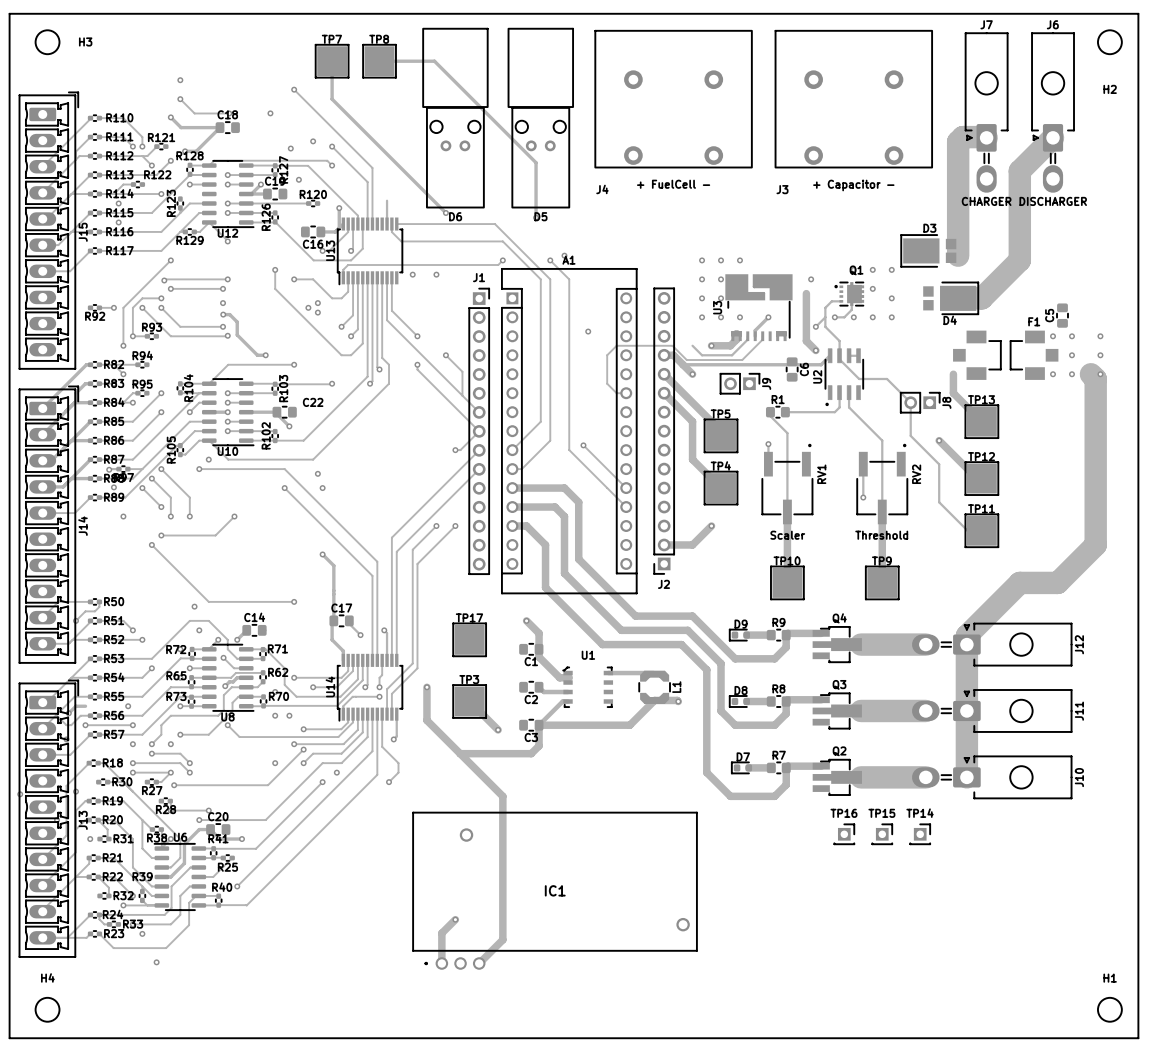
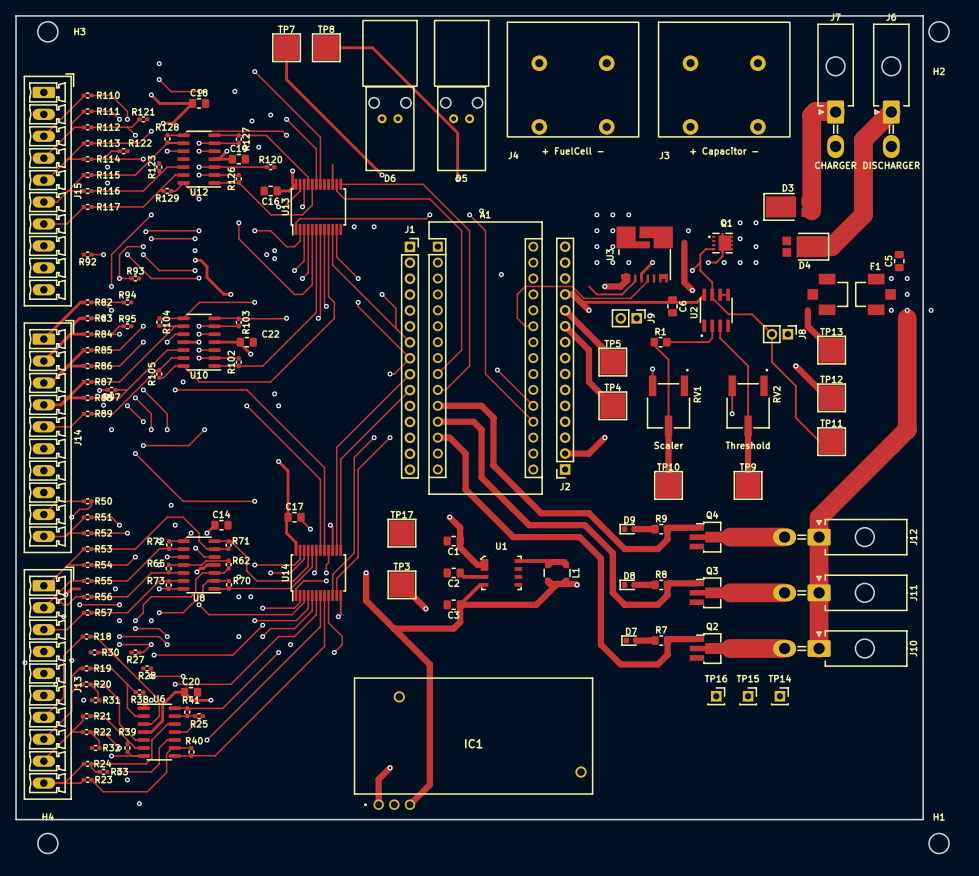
board edge: (9, 23) (9, 13) (1138, 13) (1138, 1038) (9, 1038) (9, 981) -> (16, 15) (923, 15) (923, 819) (16, 819)
via: (1100, 336) -> none
via: (1100, 355) -> none
track: (1090, 374) (1095, 378) (1095, 544) (1057, 582) (1019, 582) (966, 635) -> (907, 318) (907, 429) (819, 517) (819, 529)

